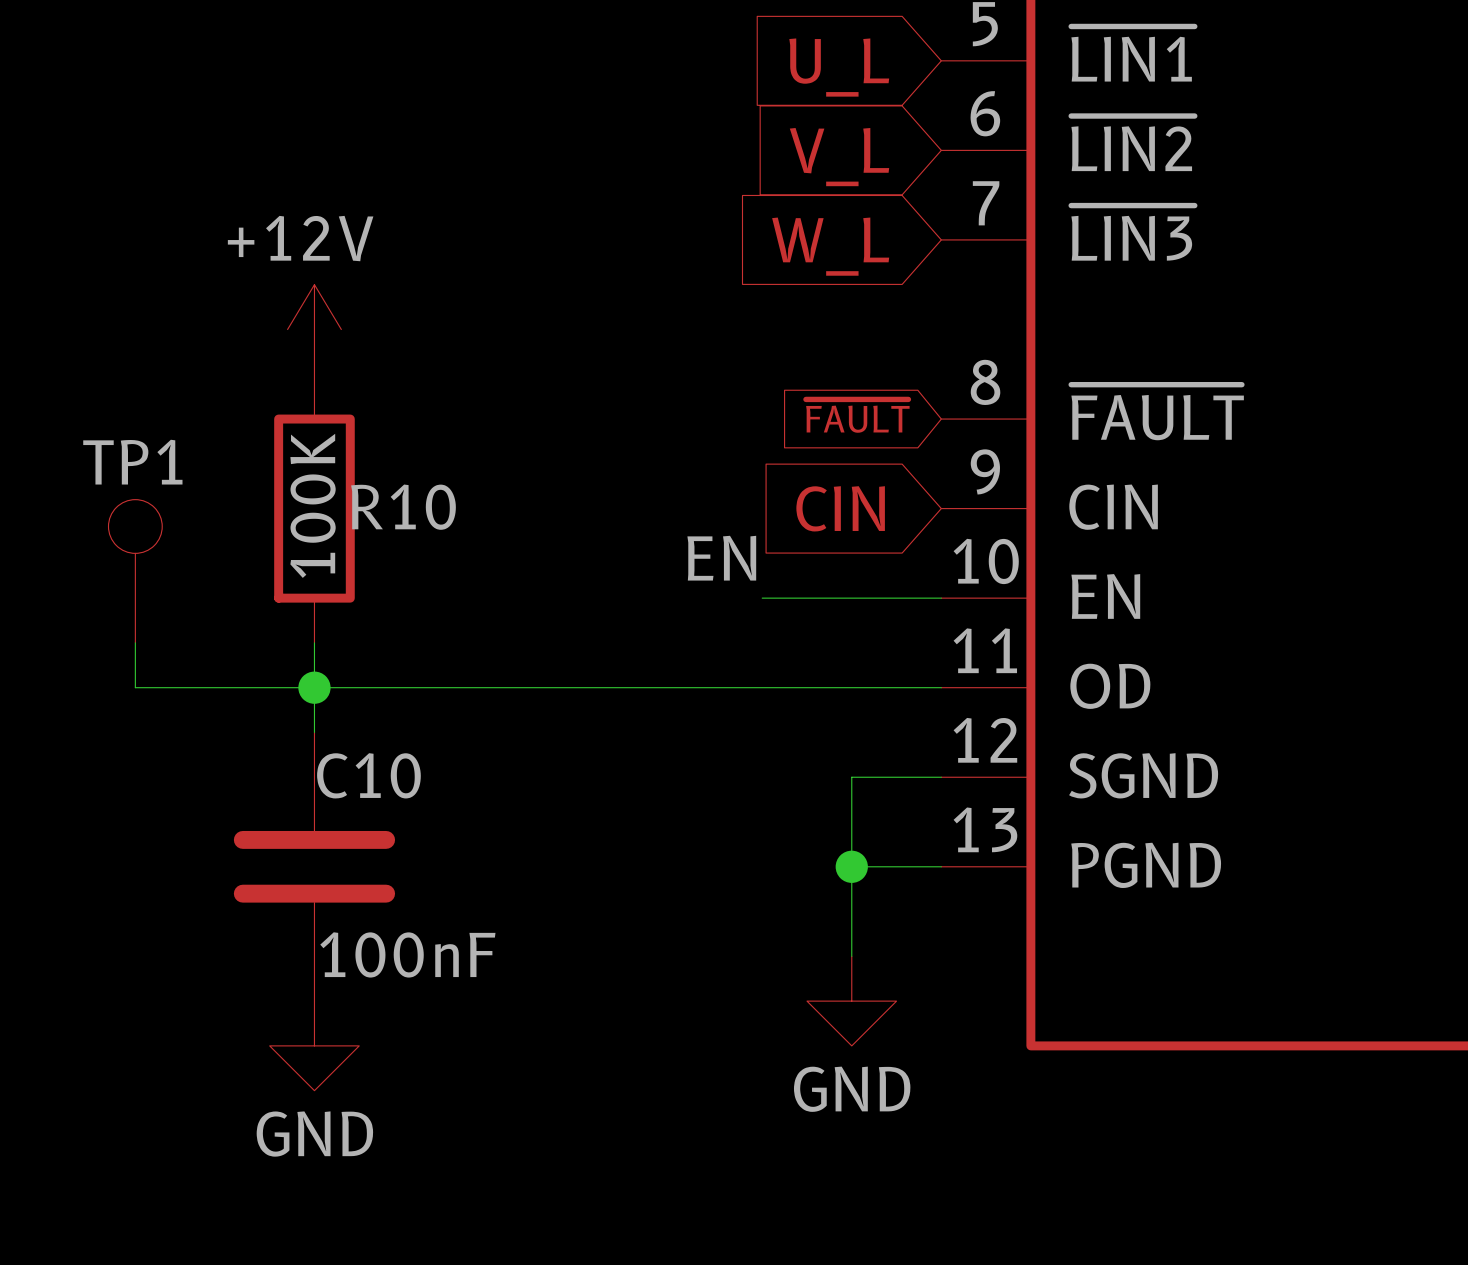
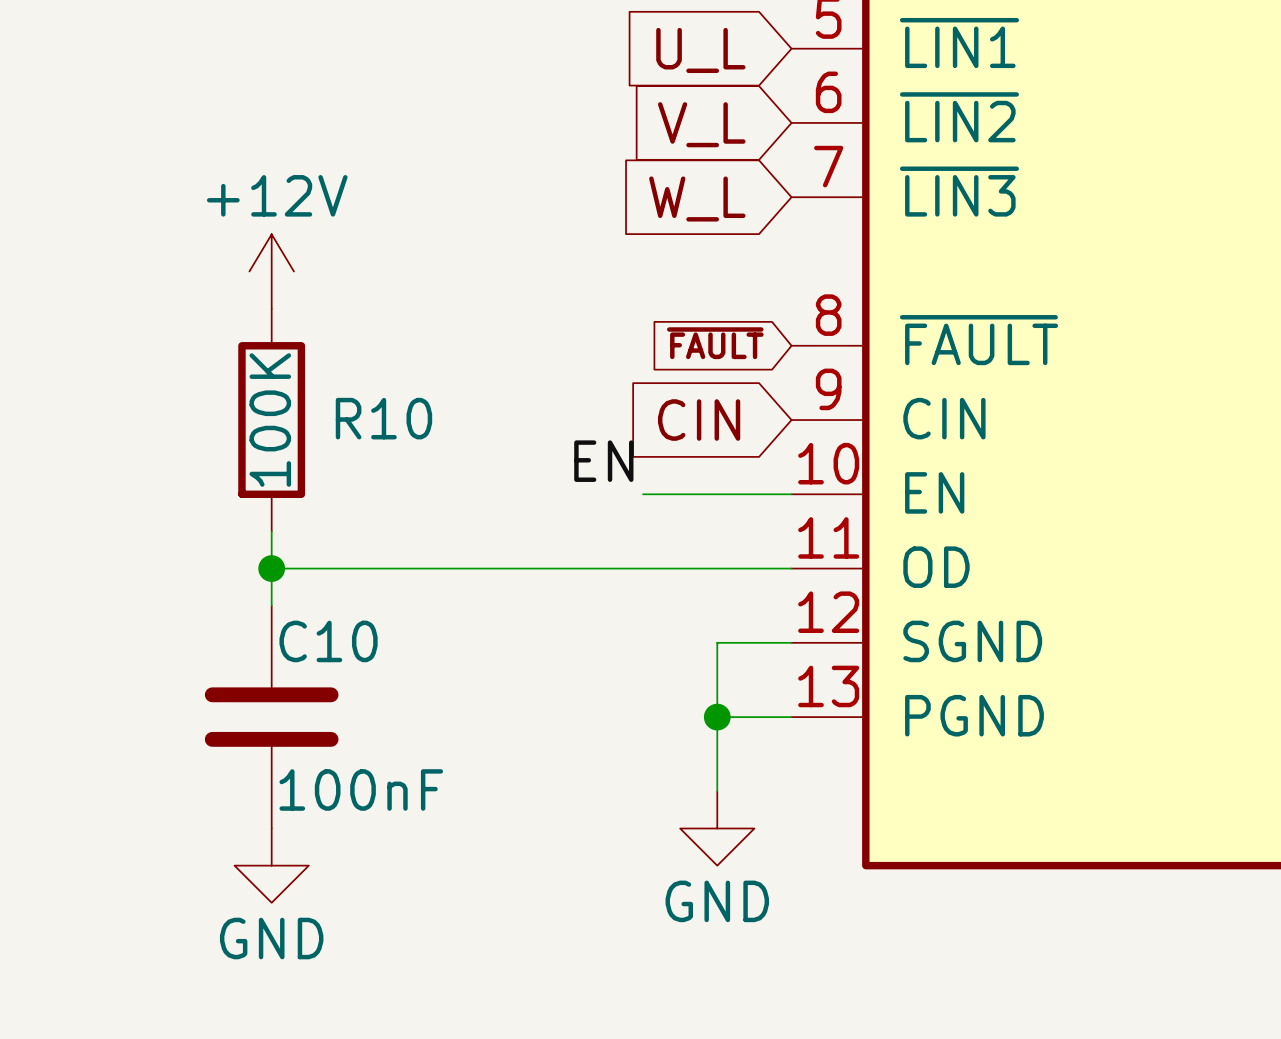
R10 name position: R10 (403, 507) -> R10 (383, 418)
TP1: (135, 571) -> none
wire: (135, 642) (135, 687) (314, 687) -> none

